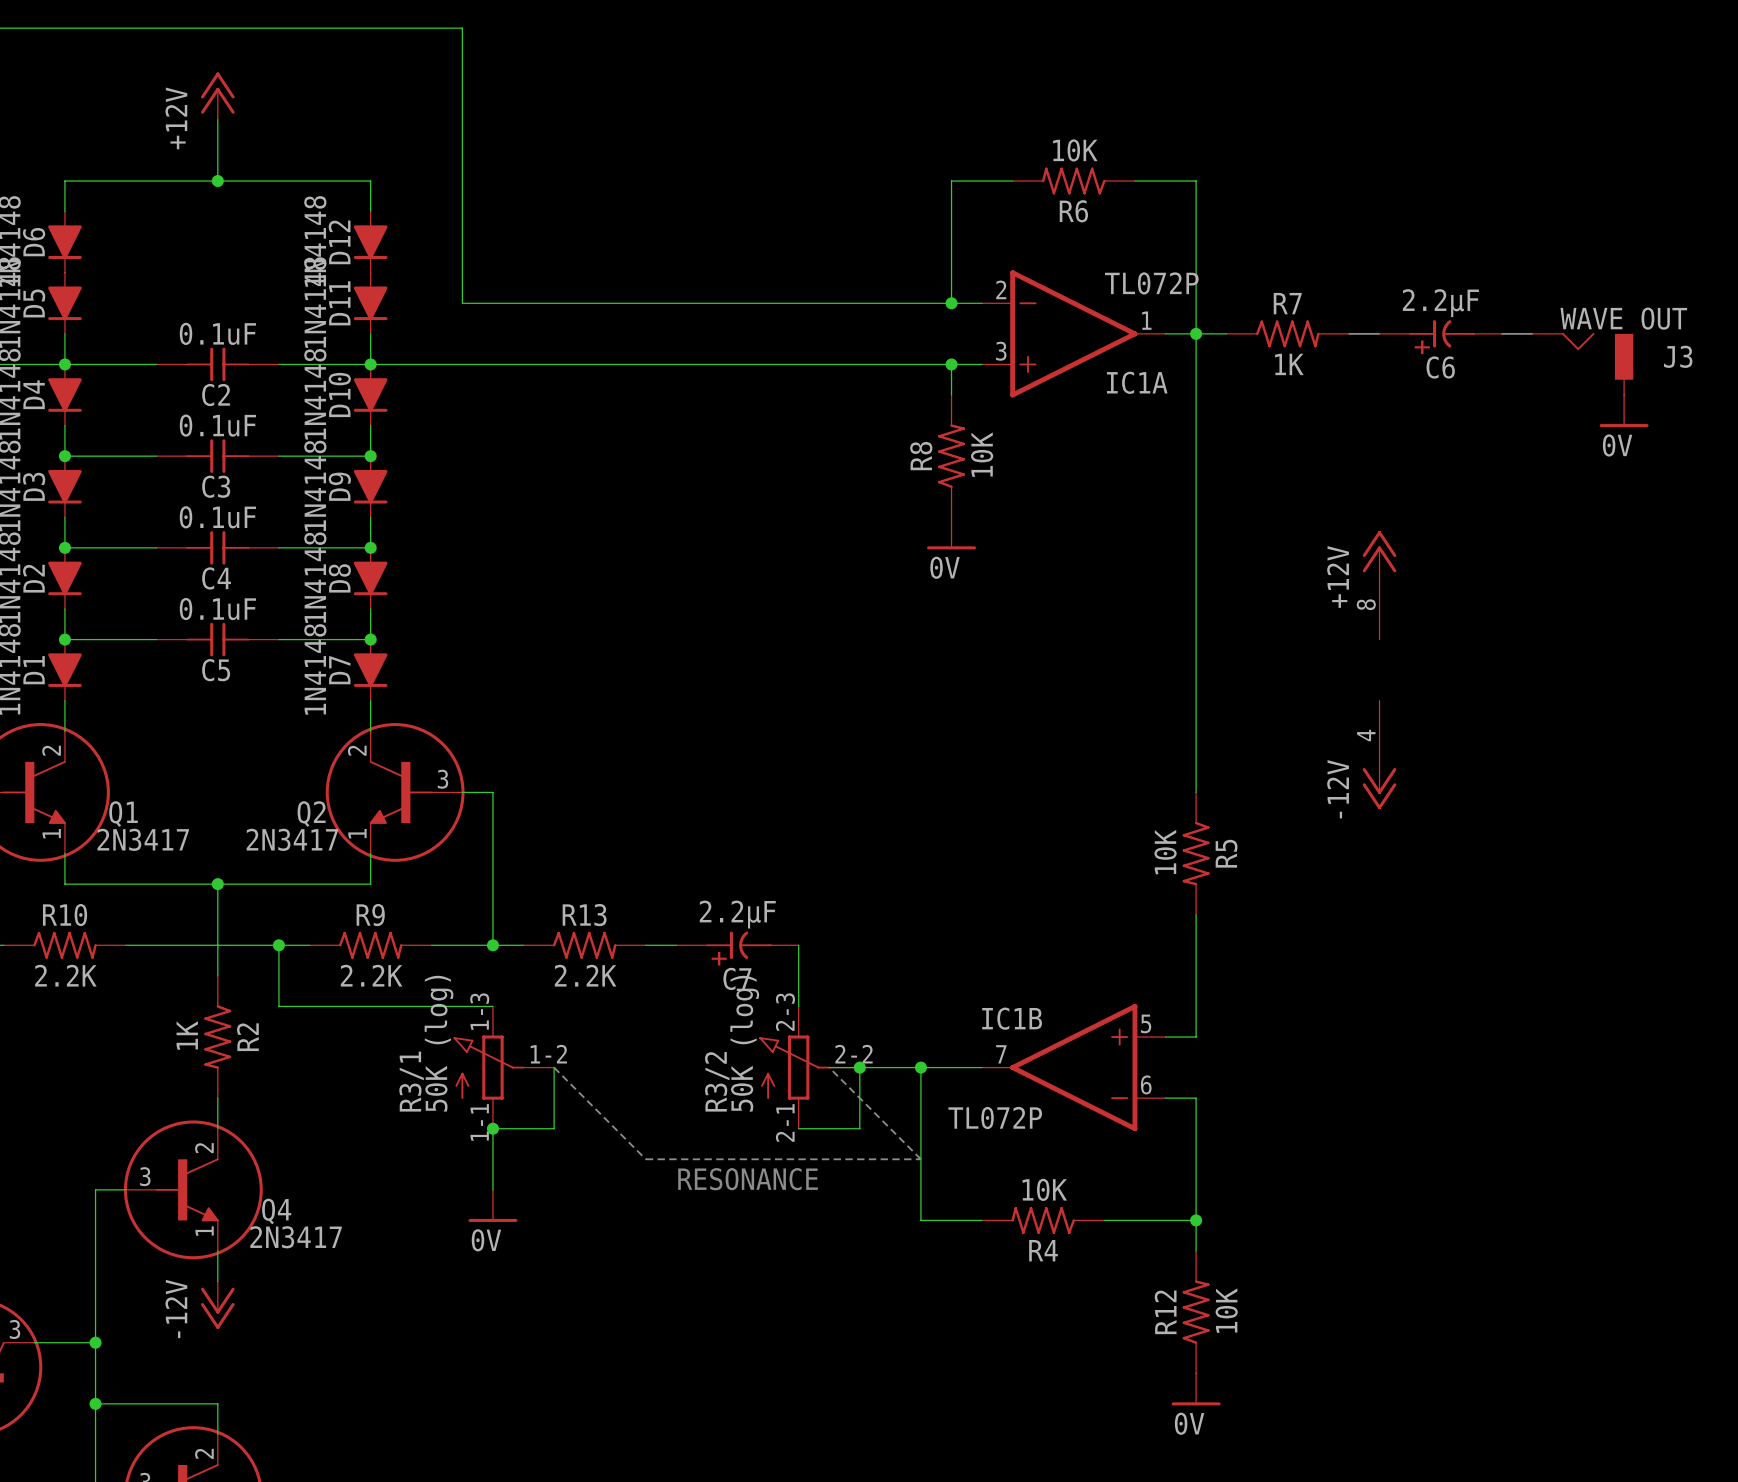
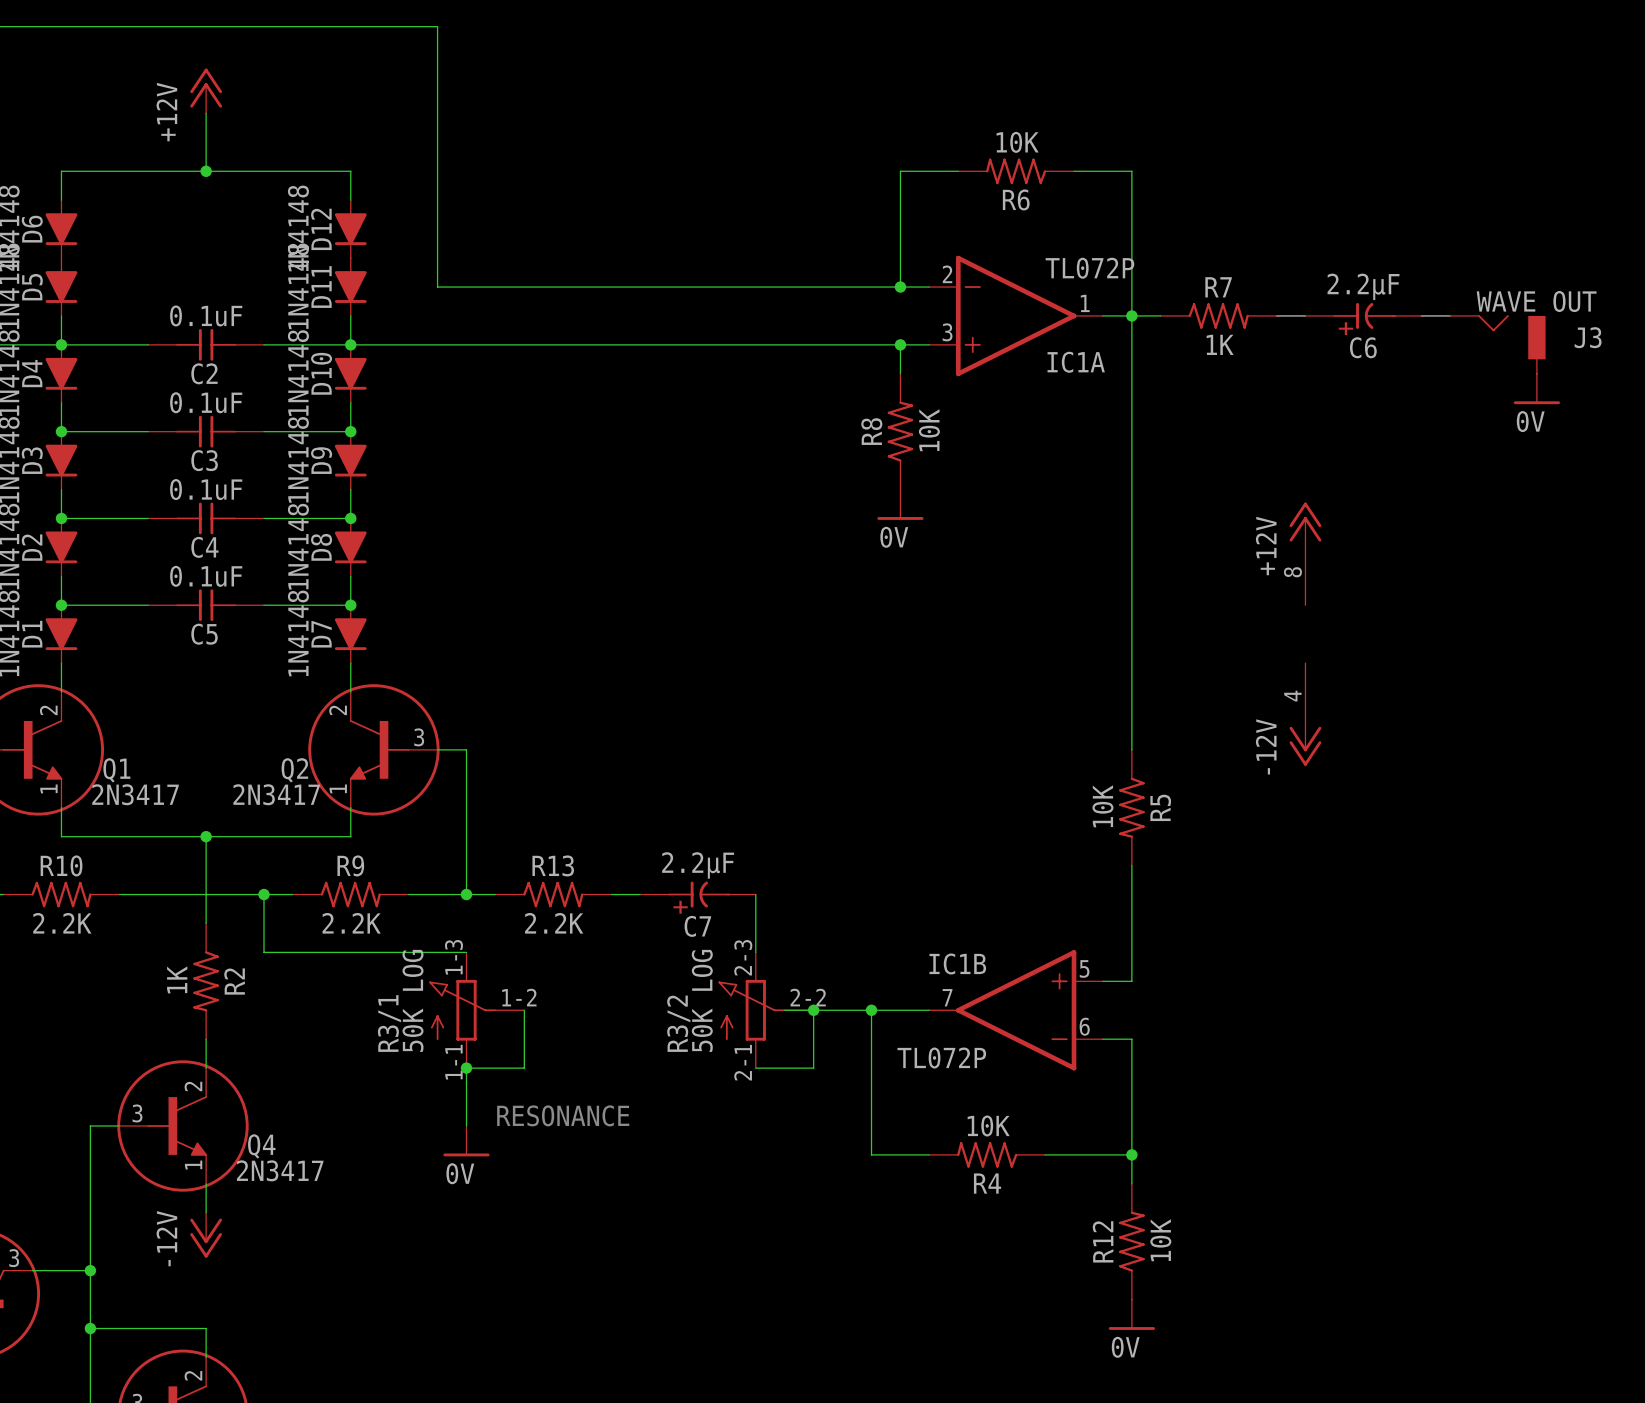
R3/1 value: 50K (log) (439, 1043) -> 50K LOG (412, 1000)
R3/2 value: 50K (log) (744, 1043) -> 50K LOG (702, 1000)
line: (554, 1067) (645, 1159) (920, 1159) (829, 1067) -> none
text position: RESONANCE (748, 1179) -> RESONANCE (563, 1115)

